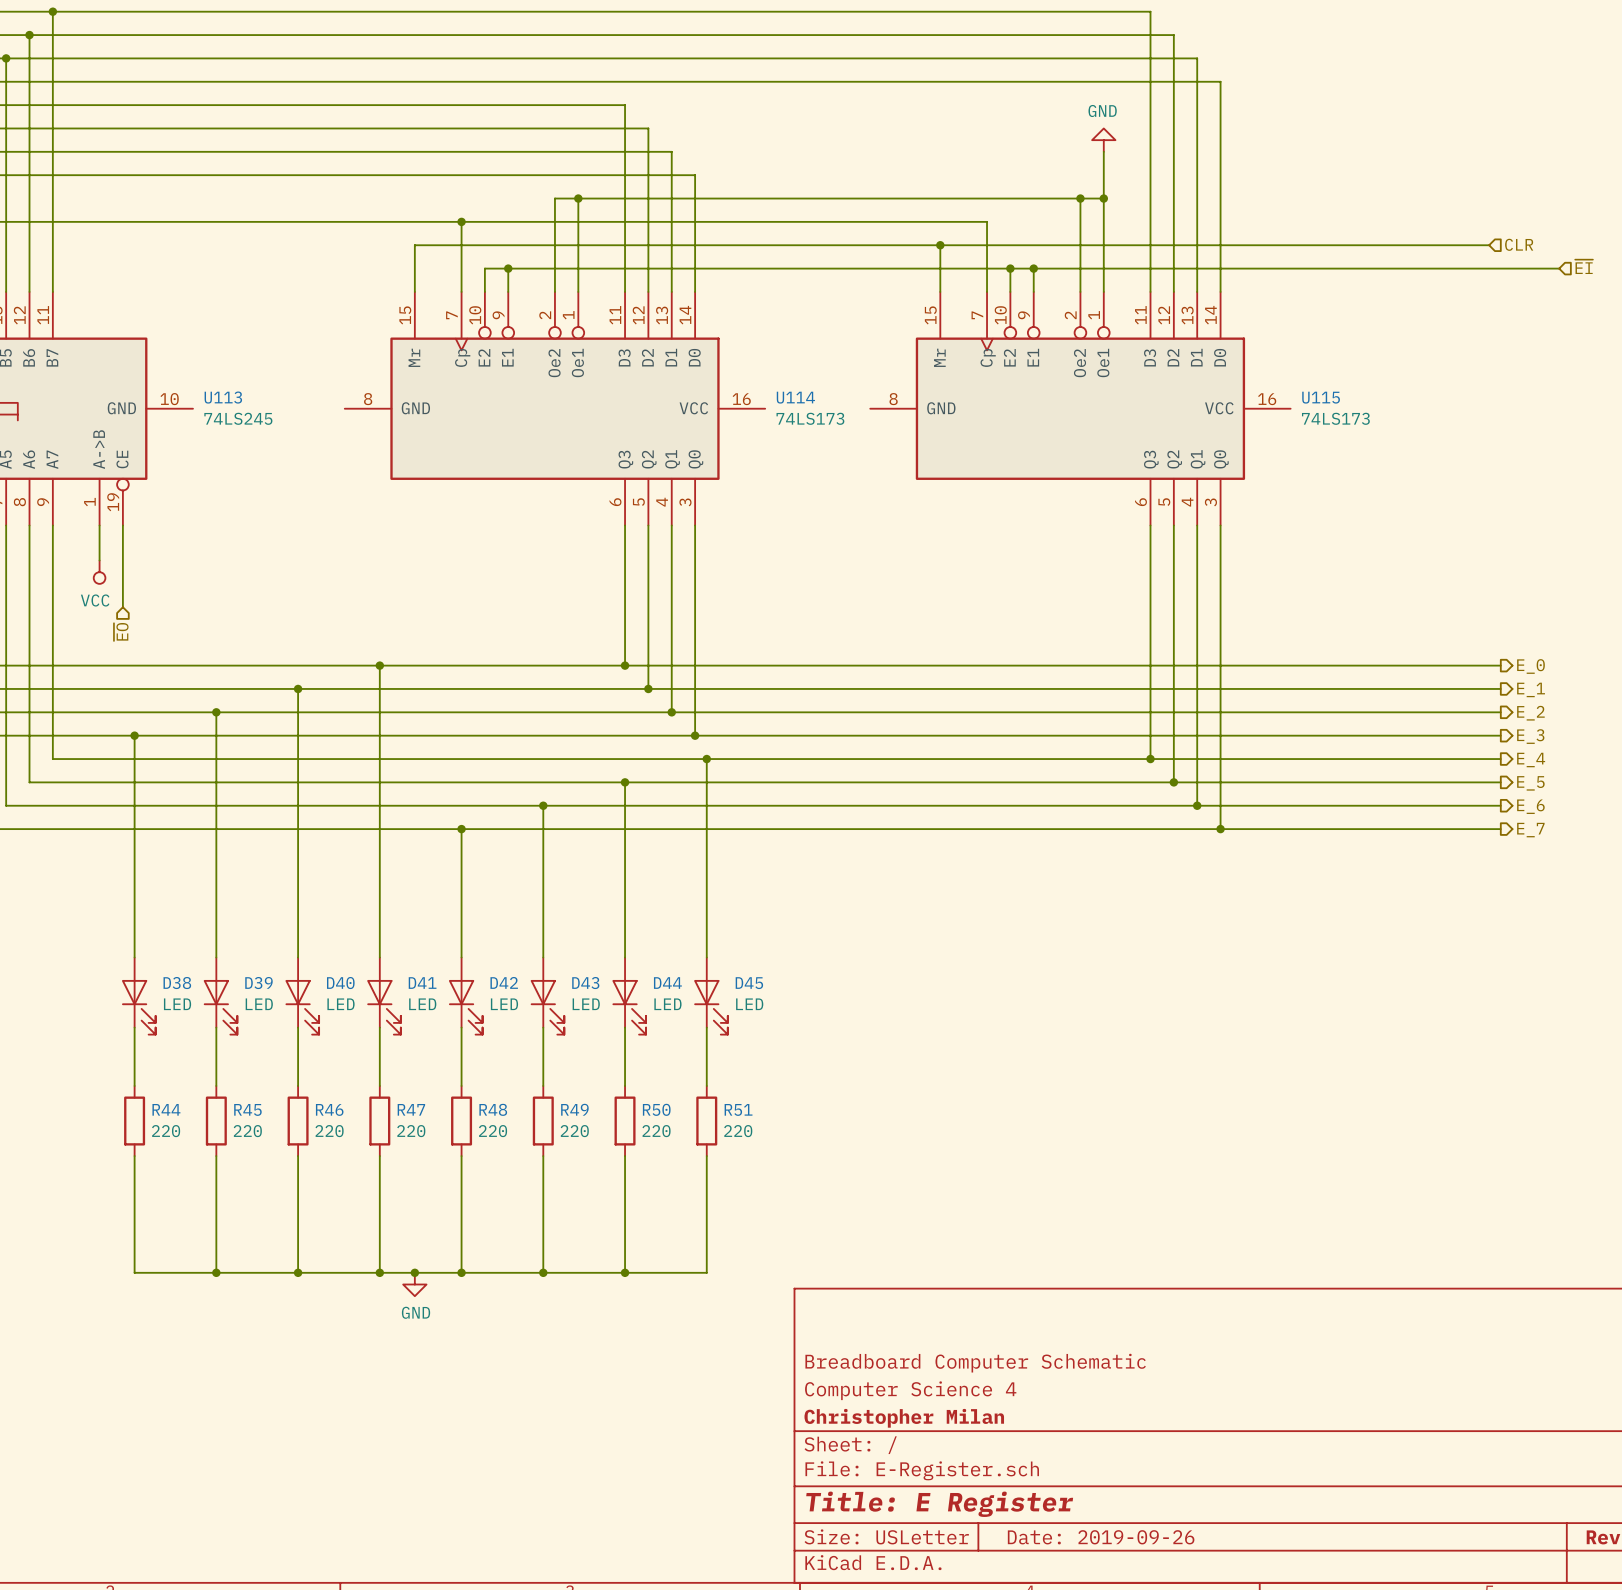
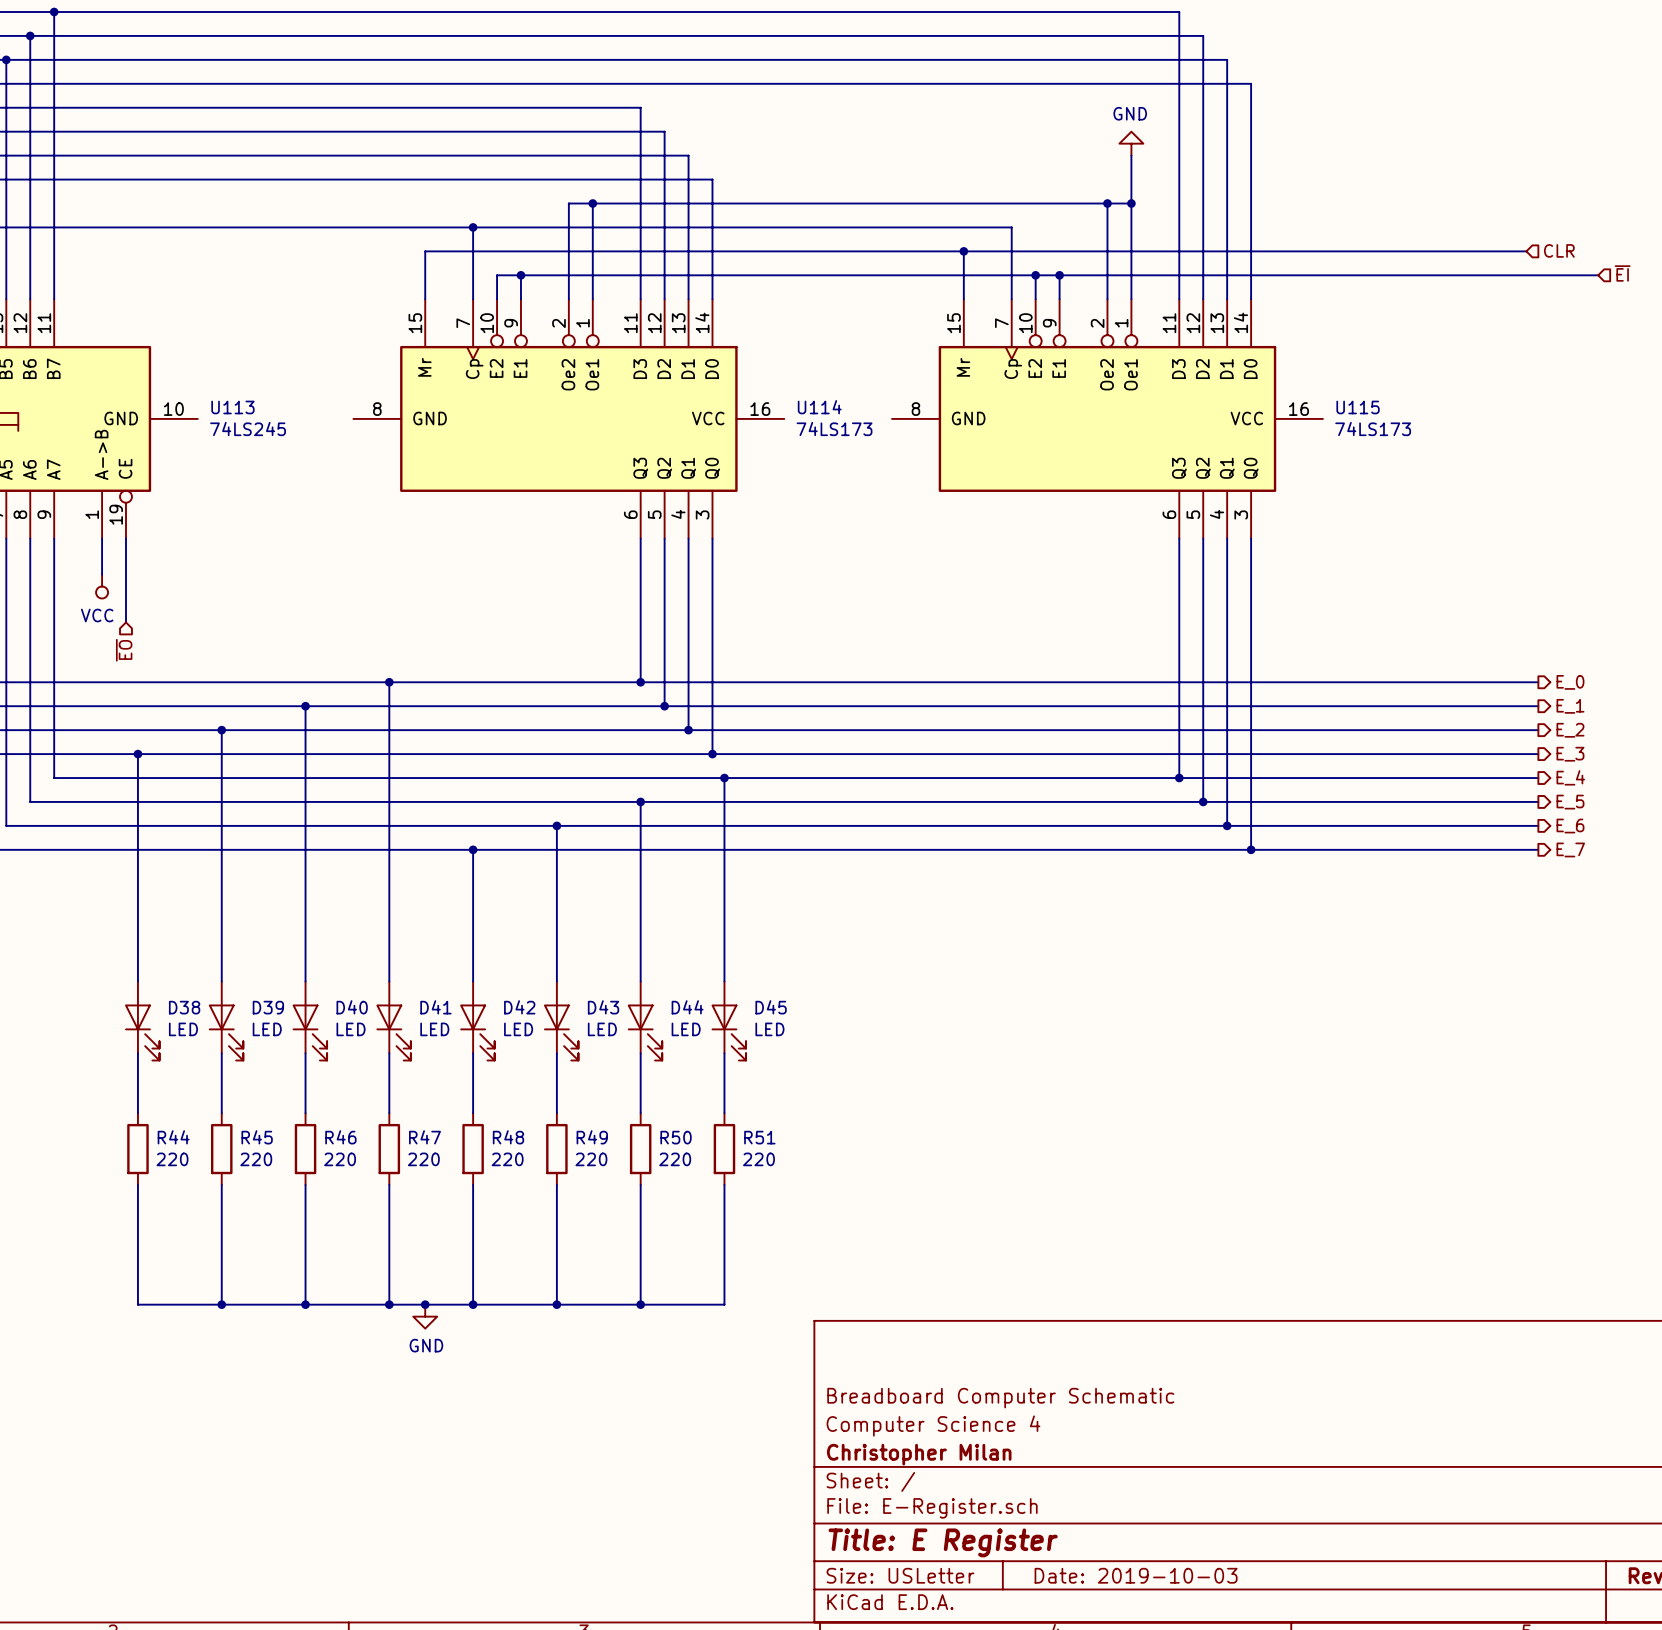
title block: Date: 2019-09-26 (1101, 1537) -> Date: 2019-10-03 (1136, 1575)

